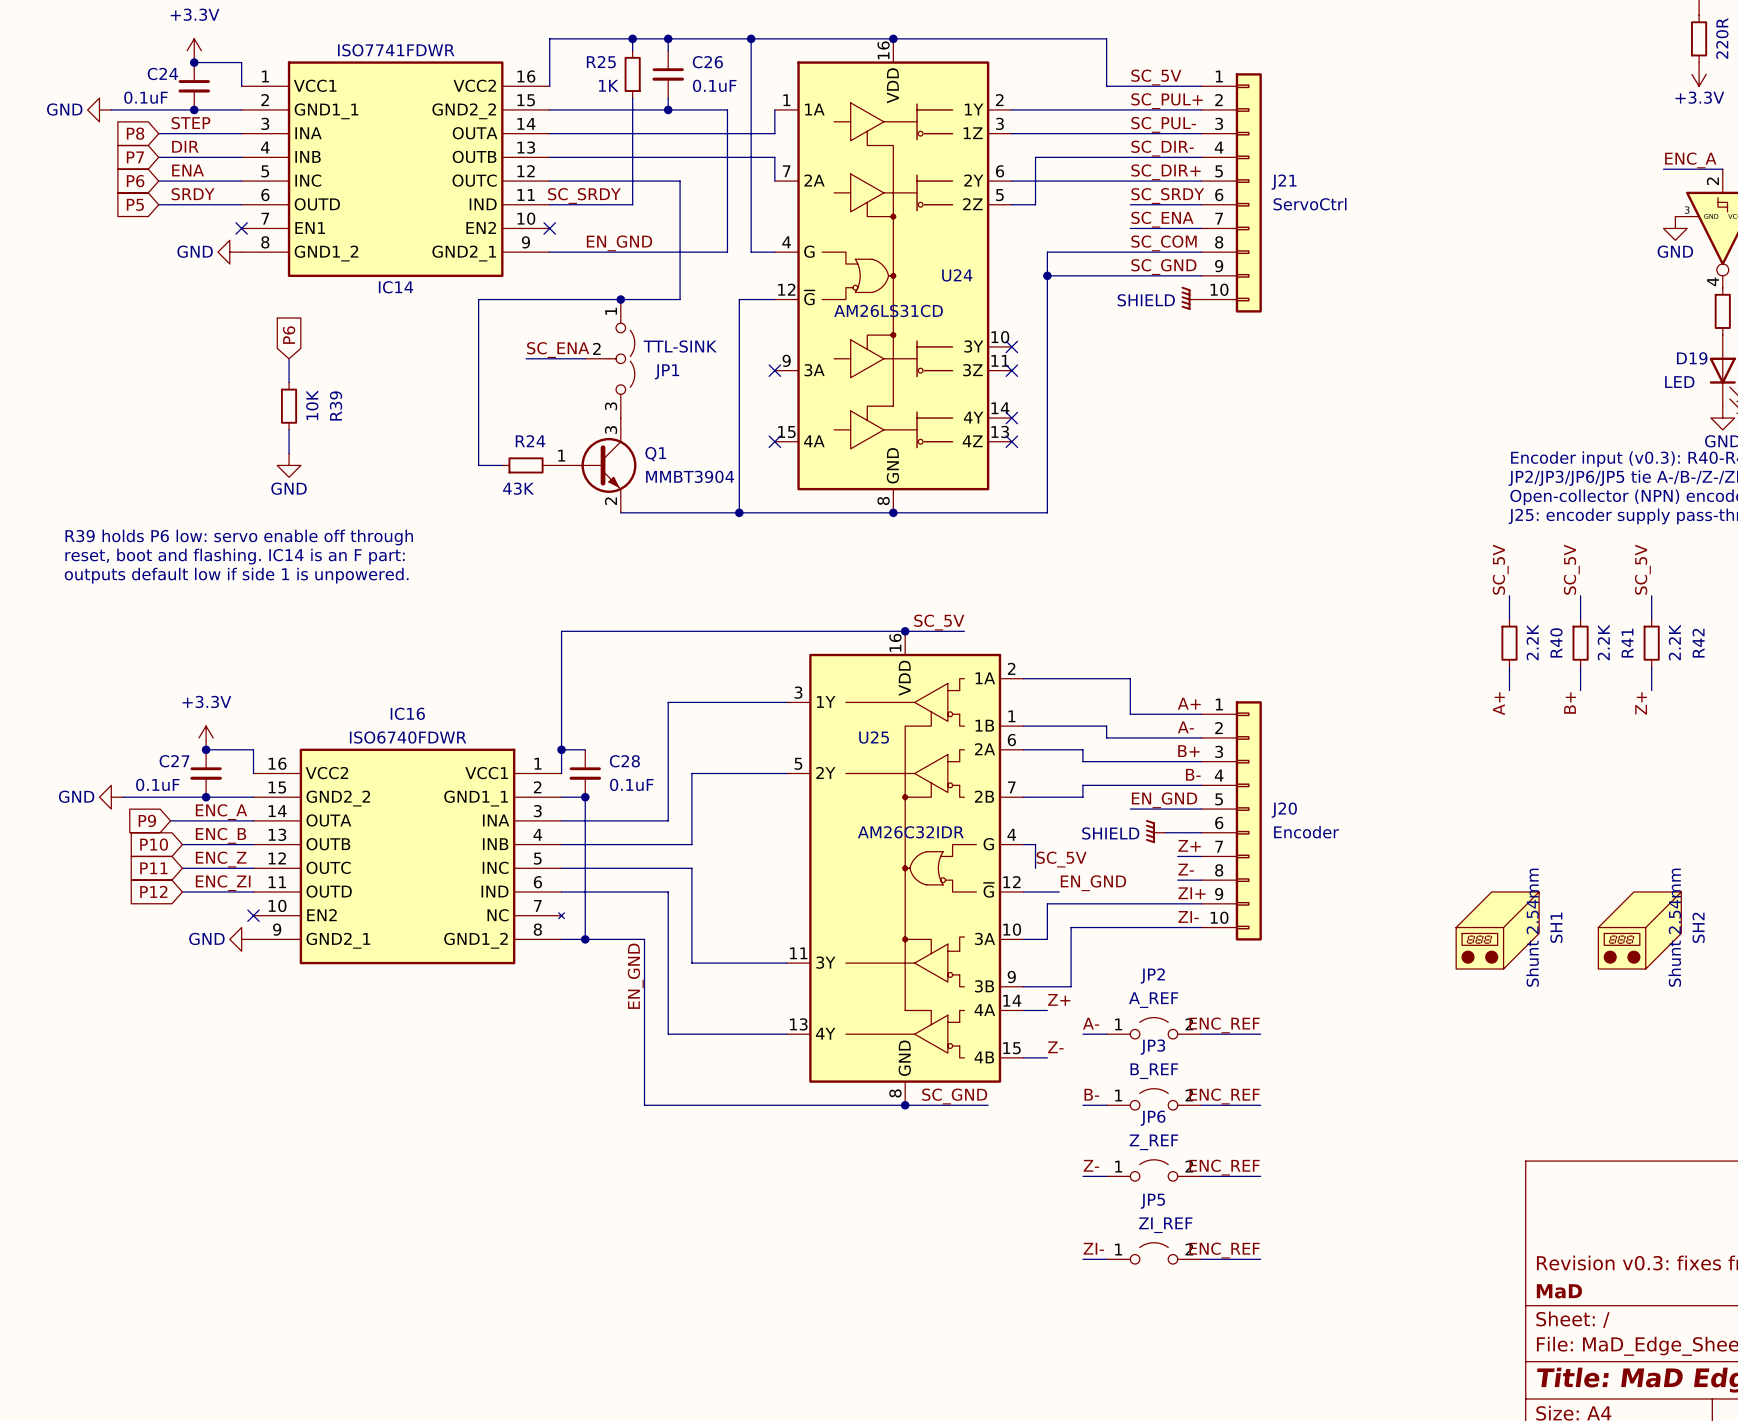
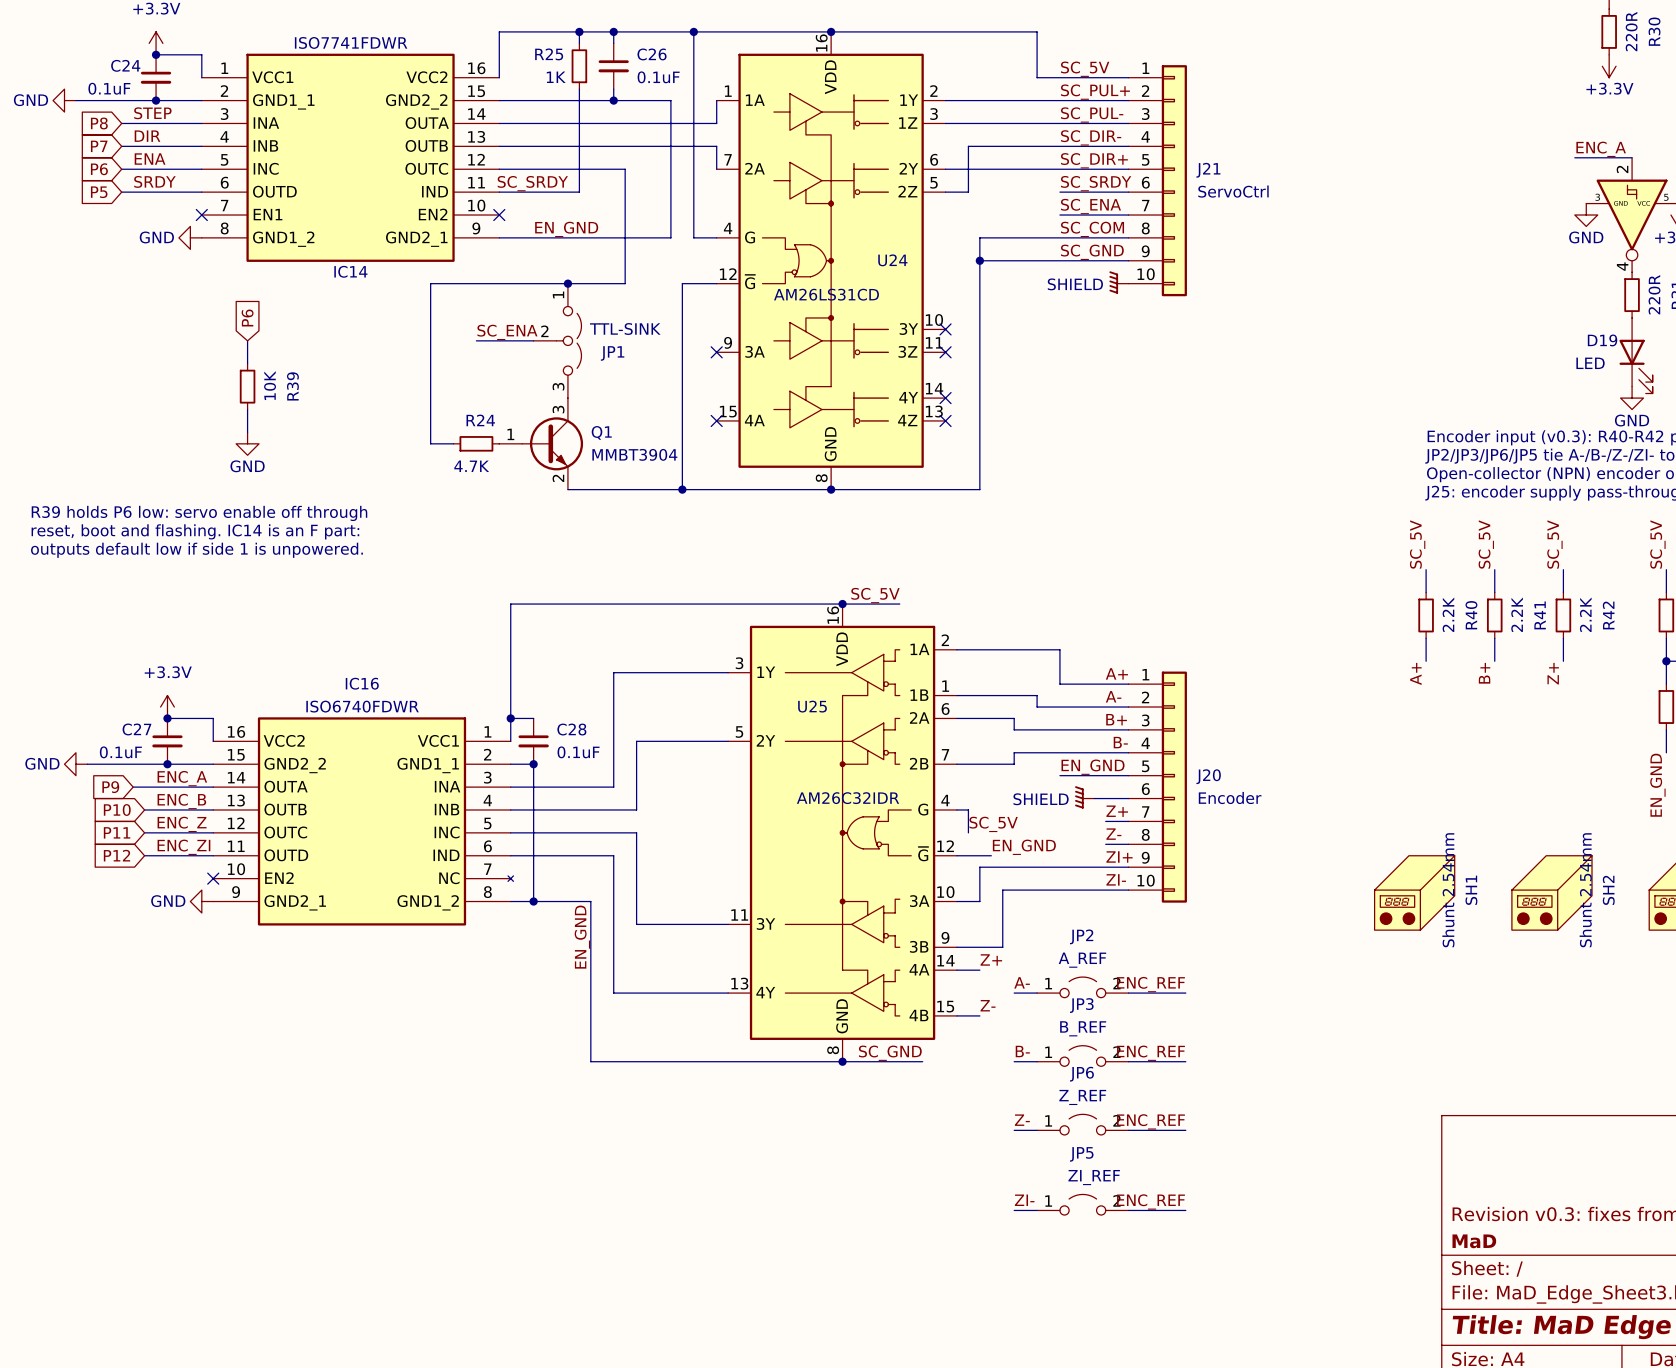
R24 value: 43K (518, 488) -> 4.7K (471, 466)

